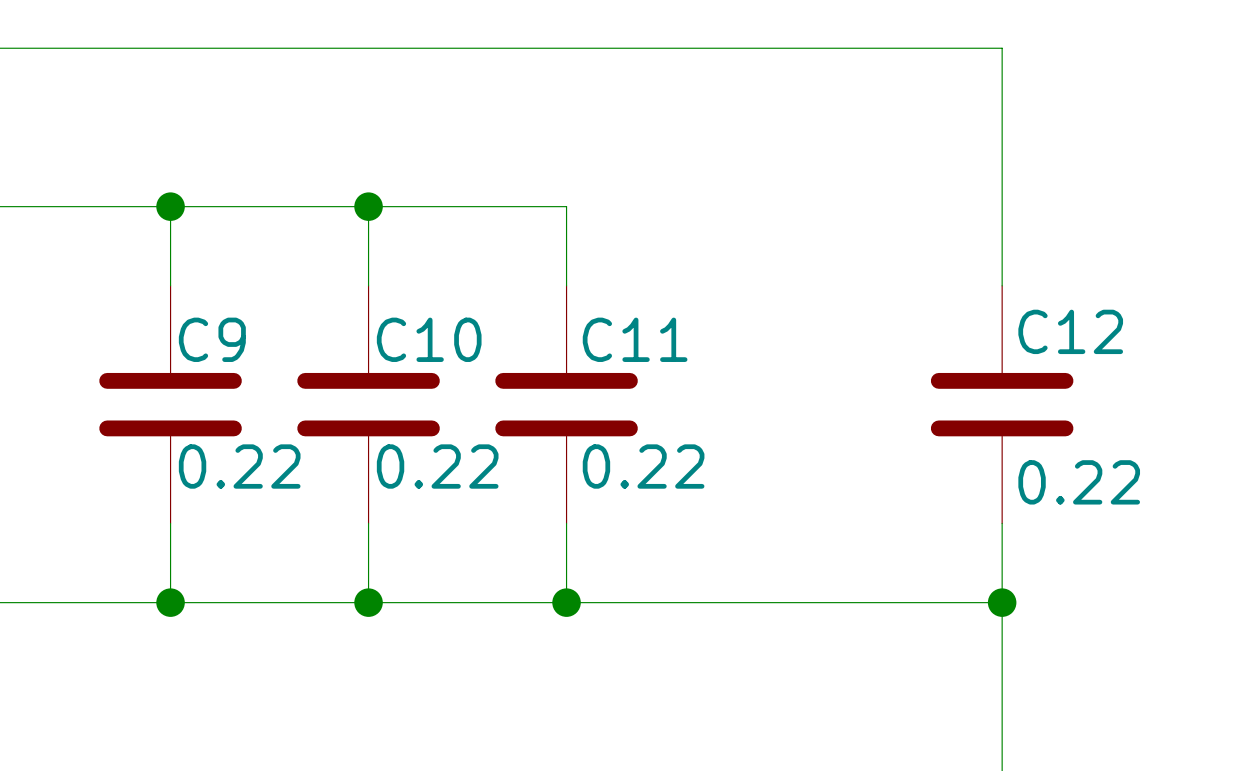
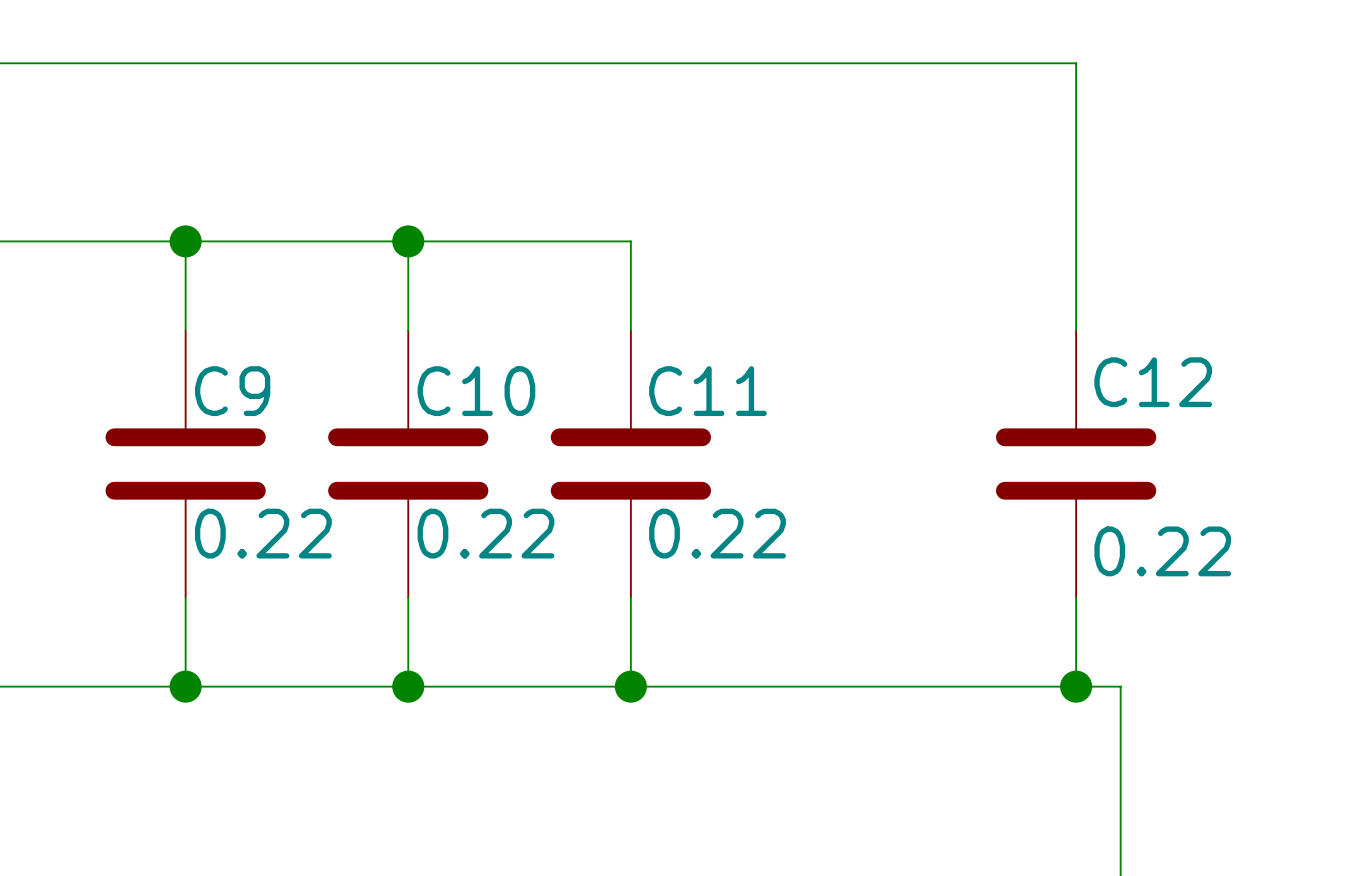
wire: (962, 48) (1002, 48) (1002, 285) -> (1076, 63) (1076, 330)
C12 position: (1002, 404) -> (1076, 464)
wire: (1002, 523) (1002, 602) -> (1076, 597) (1076, 686)
junction position: (1002, 602) -> (1076, 686)

